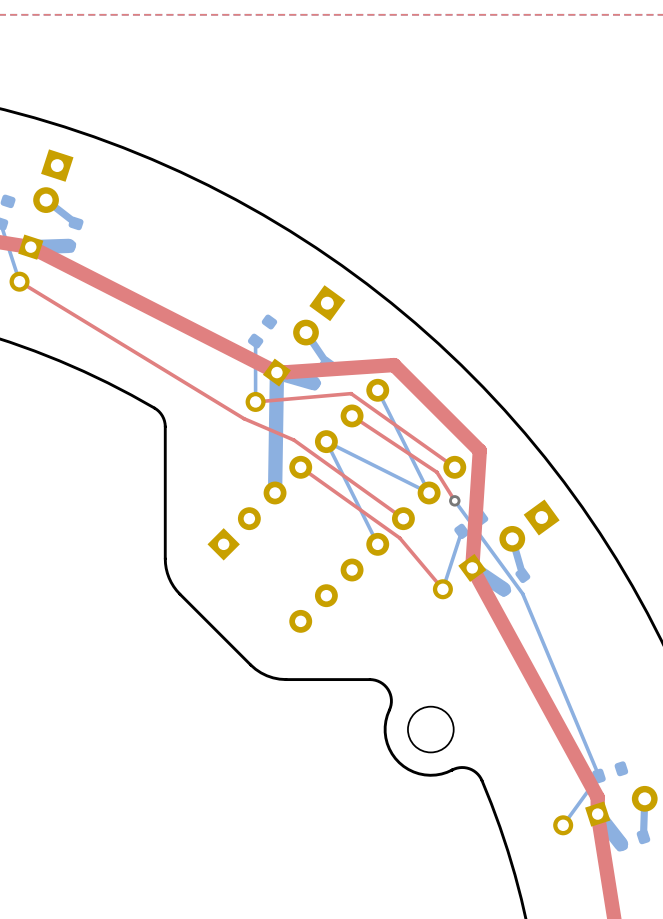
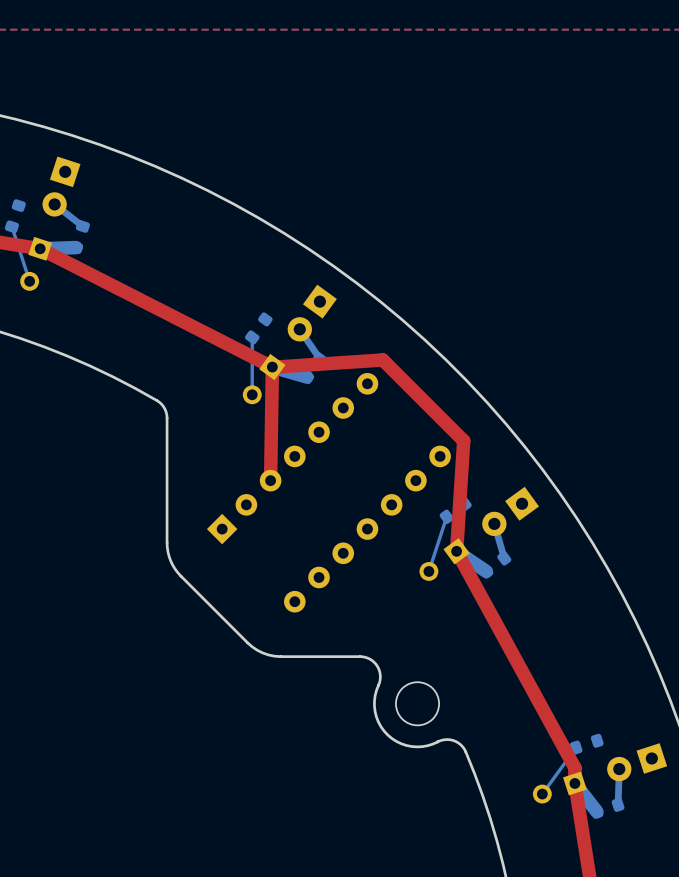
top track: (19, 281) (243, 418) (293, 440) (403, 518) -> none
top track: none -> (272, 367) (270, 480)
bottom track: (276, 372) (275, 492) -> none
bottom track: (377, 390) (429, 492) (326, 441) (377, 544) -> none
top track: (255, 401) (351, 393) (454, 467) -> none
top track: (352, 415) (436, 472) (454, 500) -> none
top track: (300, 467) (399, 538) (442, 589) -> none
bottom track: (454, 500) (522, 593) (598, 776) -> none
via: (454, 500) -> none

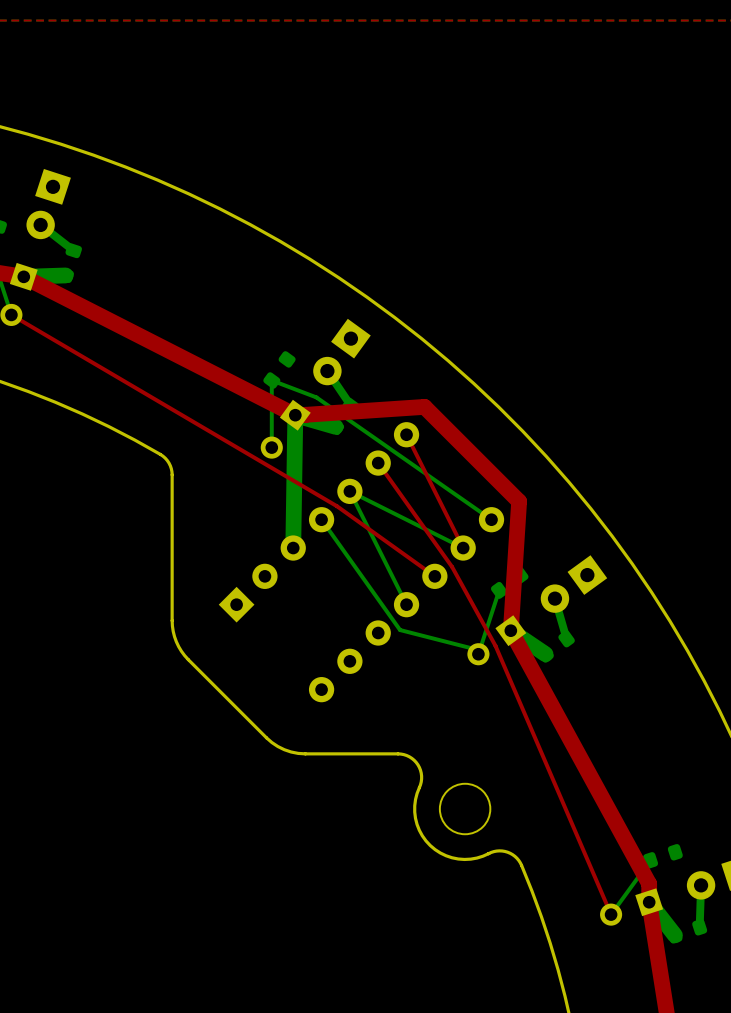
top track: none -> (11, 314) (336, 506) (434, 576)
bottom track: none -> (271, 380) (316, 397) (491, 519)
top track: (272, 367) (270, 480) -> none
bottom track: none -> (295, 415) (293, 548)
top track: none -> (406, 434) (463, 548)
top track: none -> (378, 463) (452, 566) (495, 645) (611, 914)
bottom track: none -> (321, 519) (400, 630) (478, 650) (478, 654)
bottom track: none -> (463, 548) (349, 491) (406, 604)

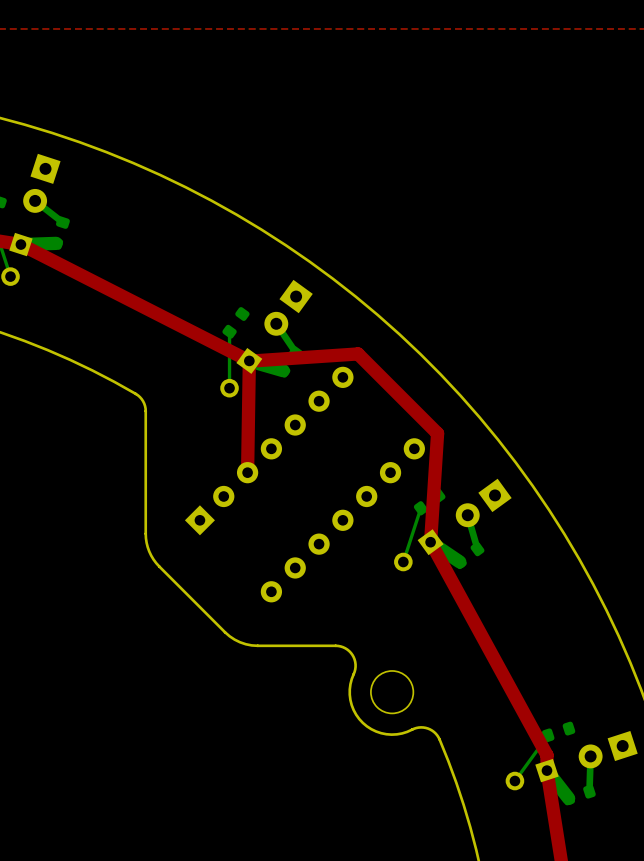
top track: (11, 314) (336, 506) (434, 576) -> none
bottom track: (271, 380) (316, 397) (491, 519) -> none
top track: none -> (249, 360) (247, 472)
bottom track: (295, 415) (293, 548) -> none
top track: (406, 434) (463, 548) -> none
top track: (378, 463) (452, 566) (495, 645) (611, 914) -> none
bottom track: (321, 519) (400, 630) (478, 650) (478, 654) -> none
bottom track: (463, 548) (349, 491) (406, 604) -> none

